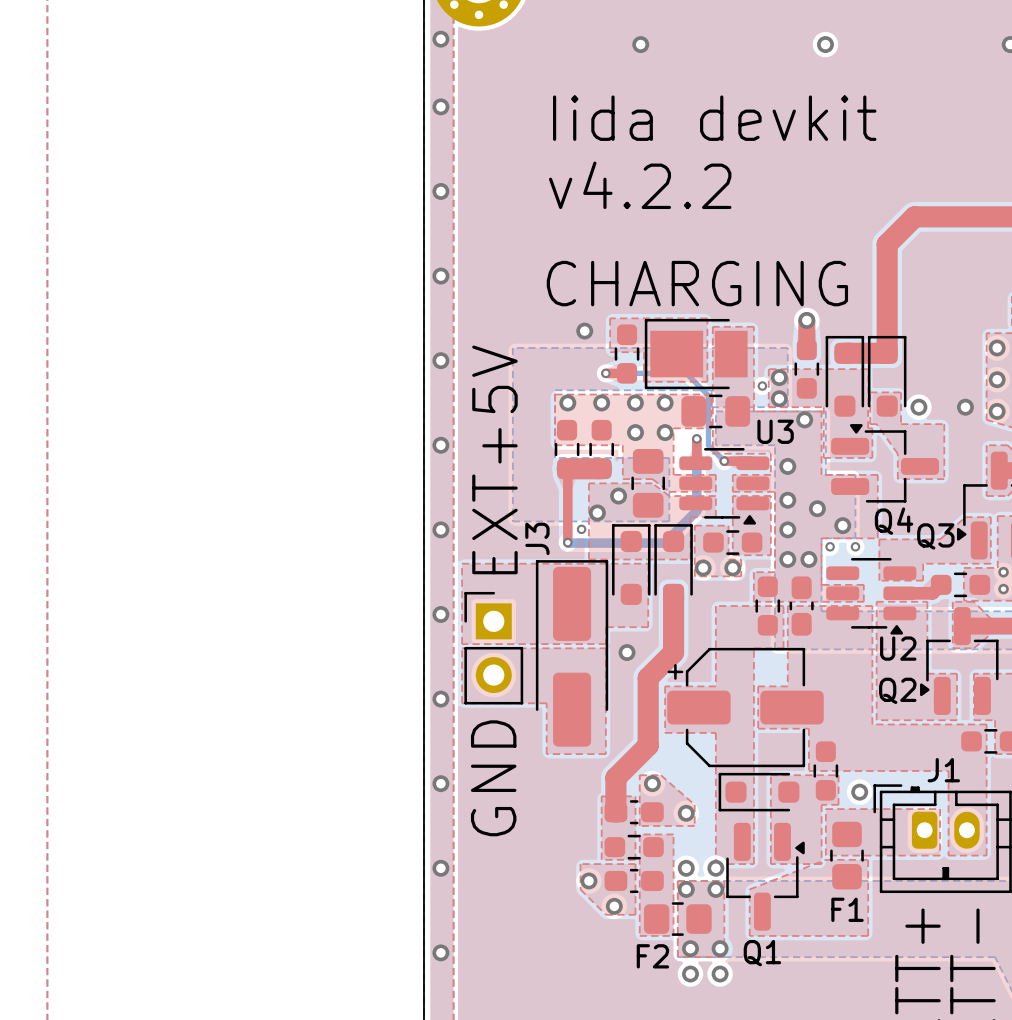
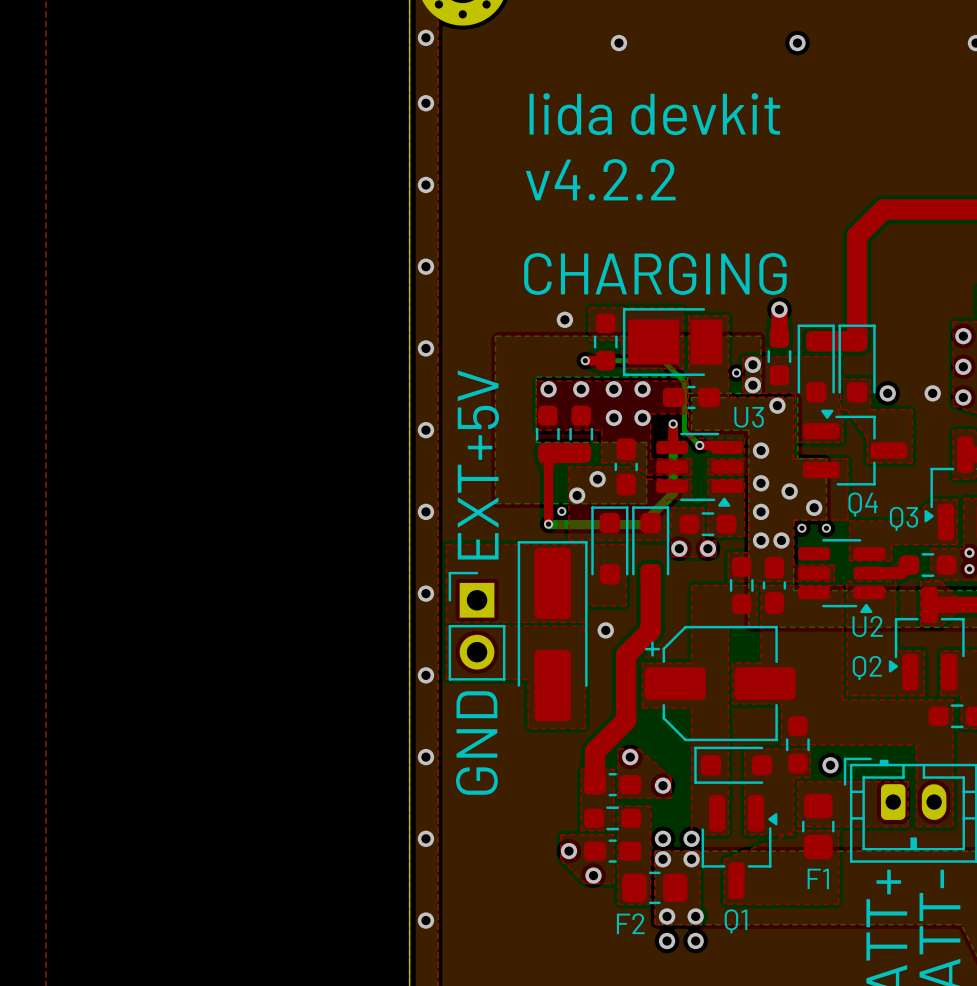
part footprint: [681, 394, 751, 429] -> [662, 385, 721, 410]
part footprint: [631, 448, 666, 518] -> [614, 438, 638, 496]
J3 name: J3 (537, 538) -> none
J1 name: J1 (943, 770) -> none

